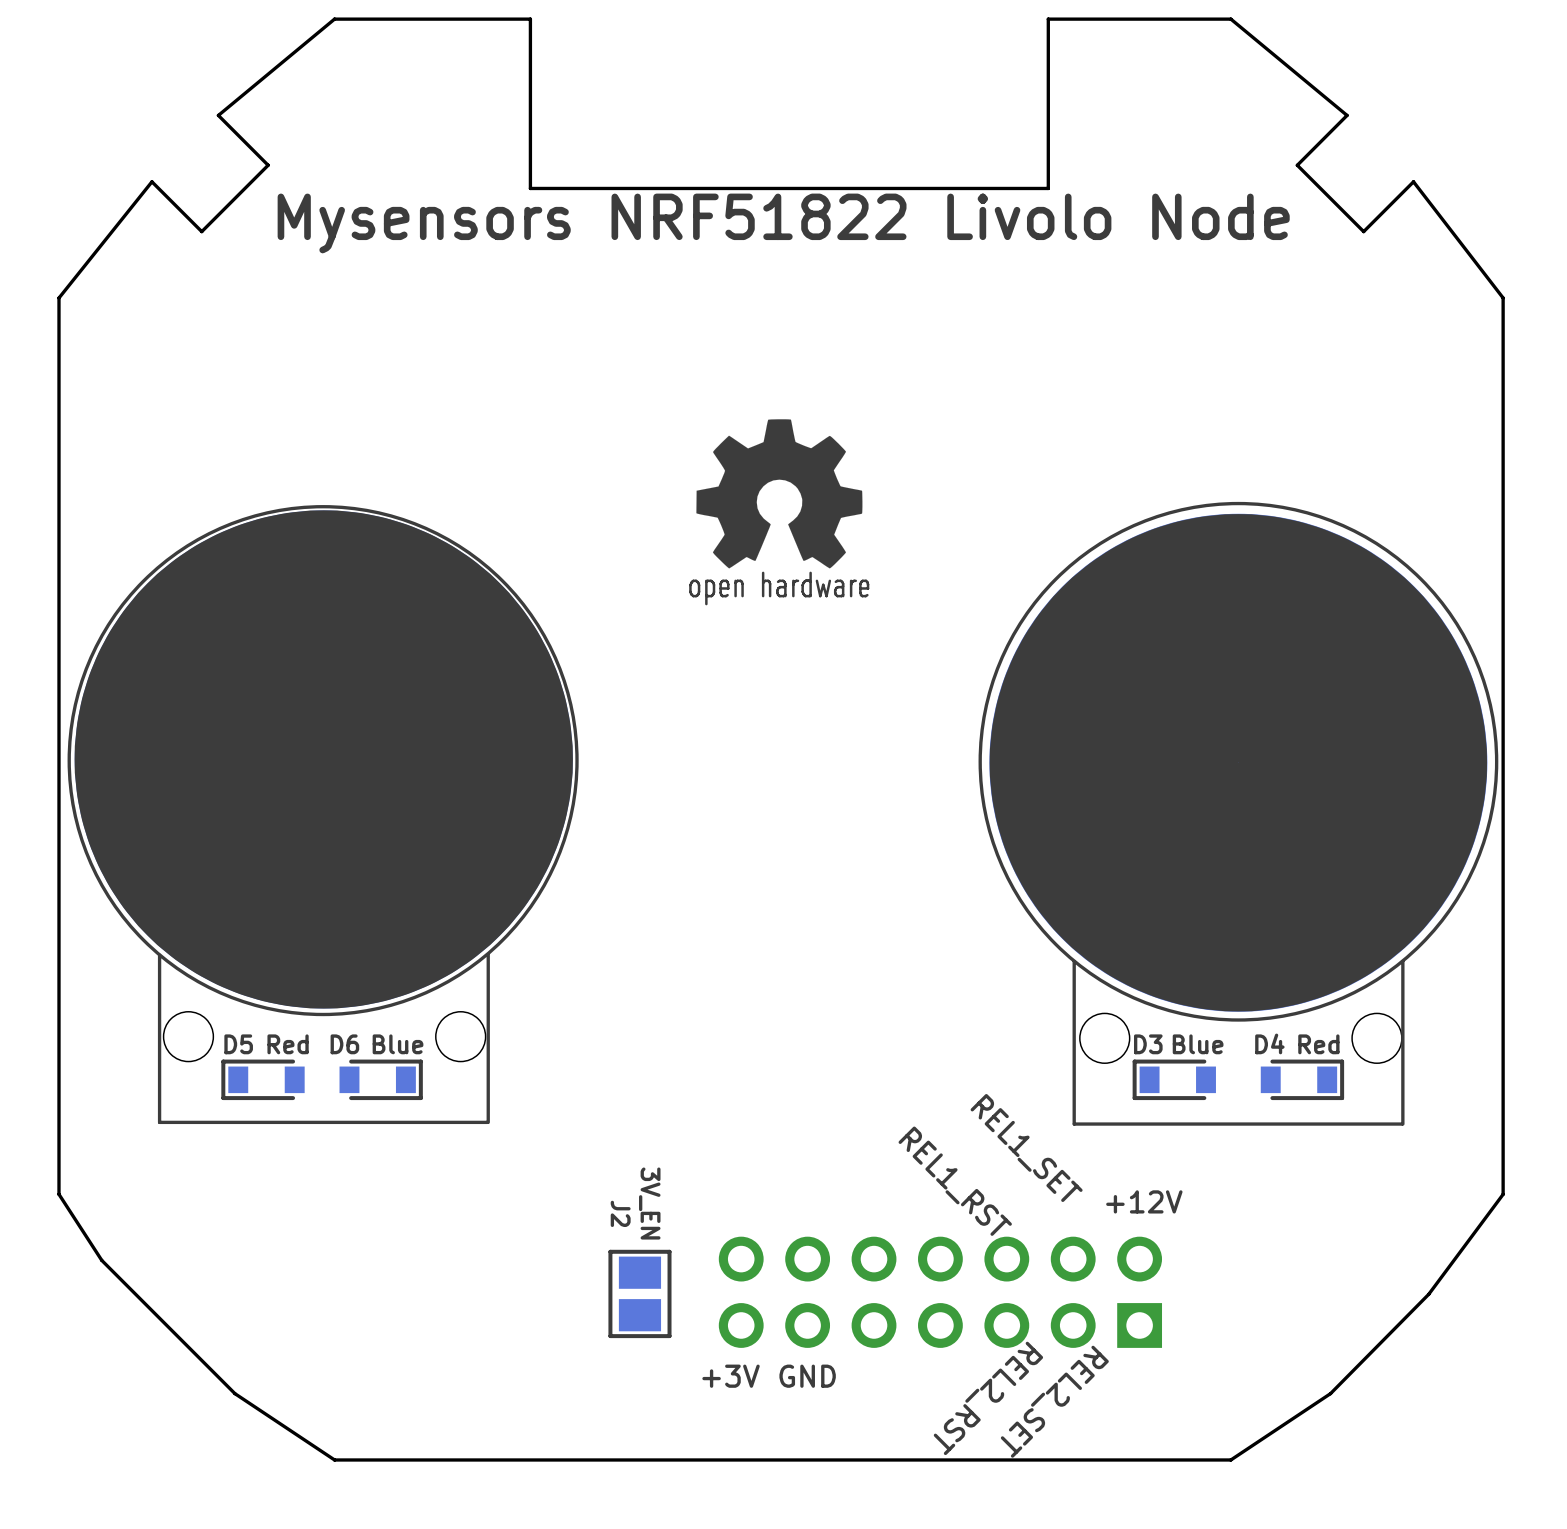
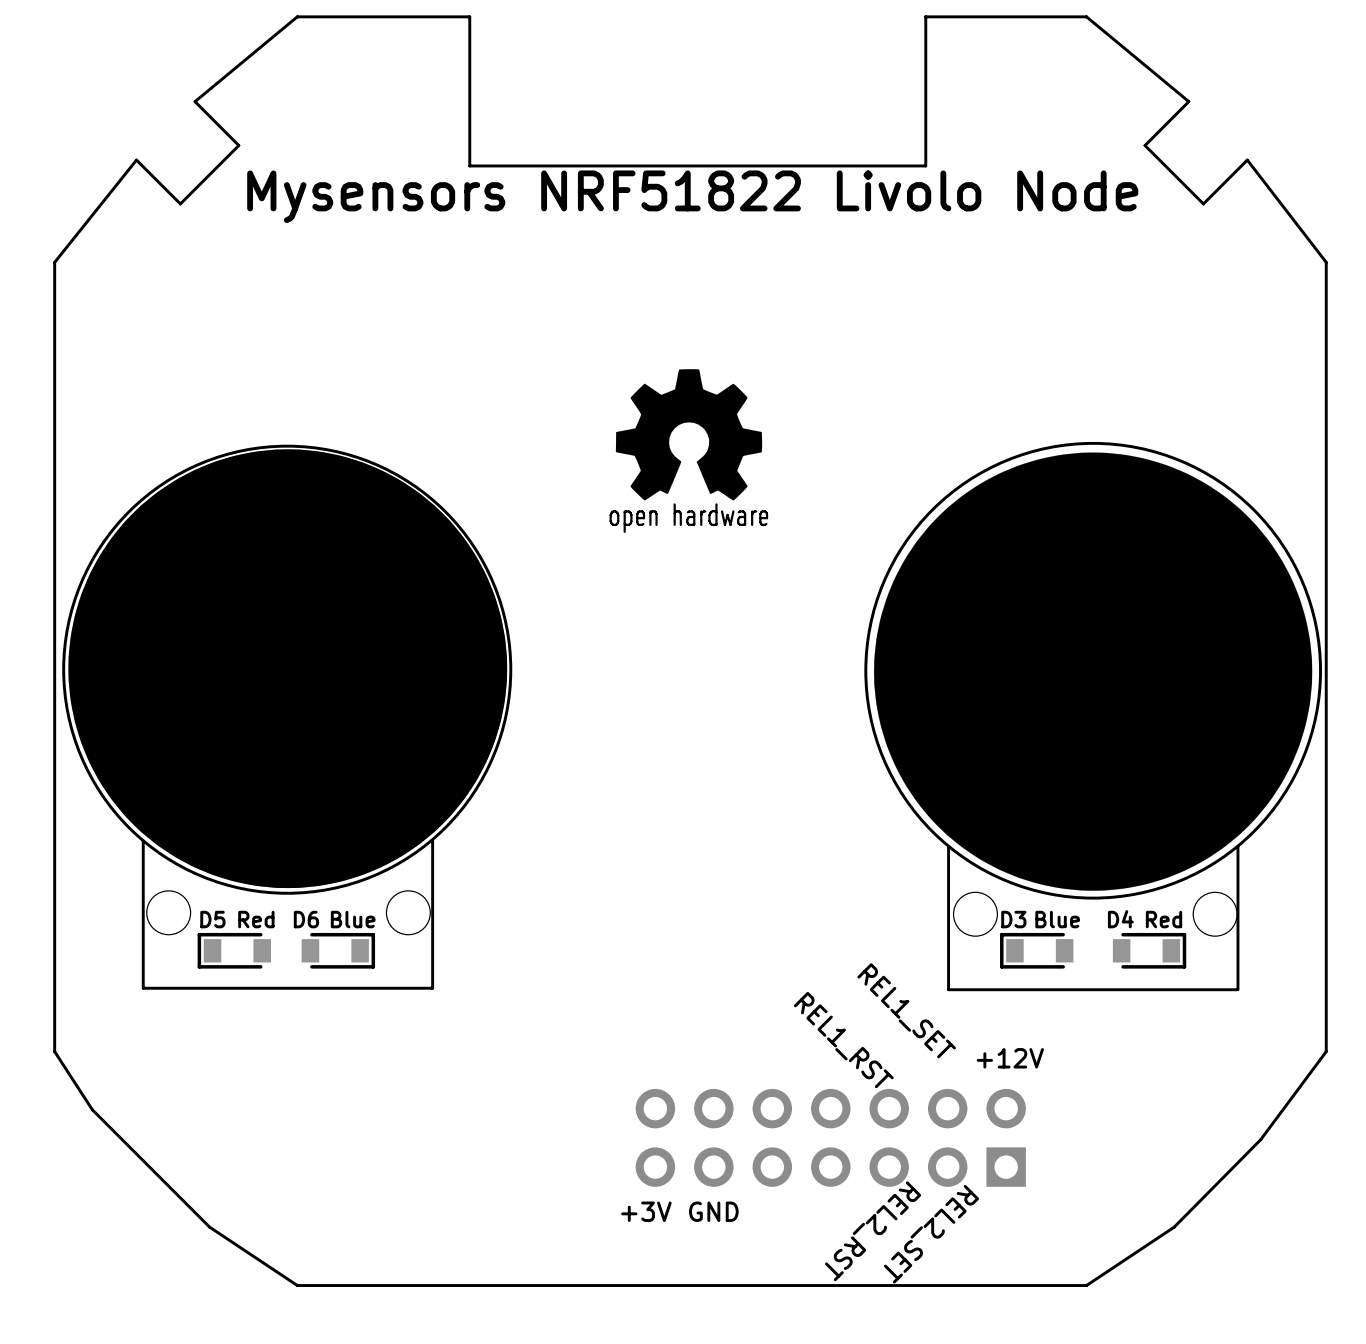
J2: 3V_EN (639, 1293) -> none

